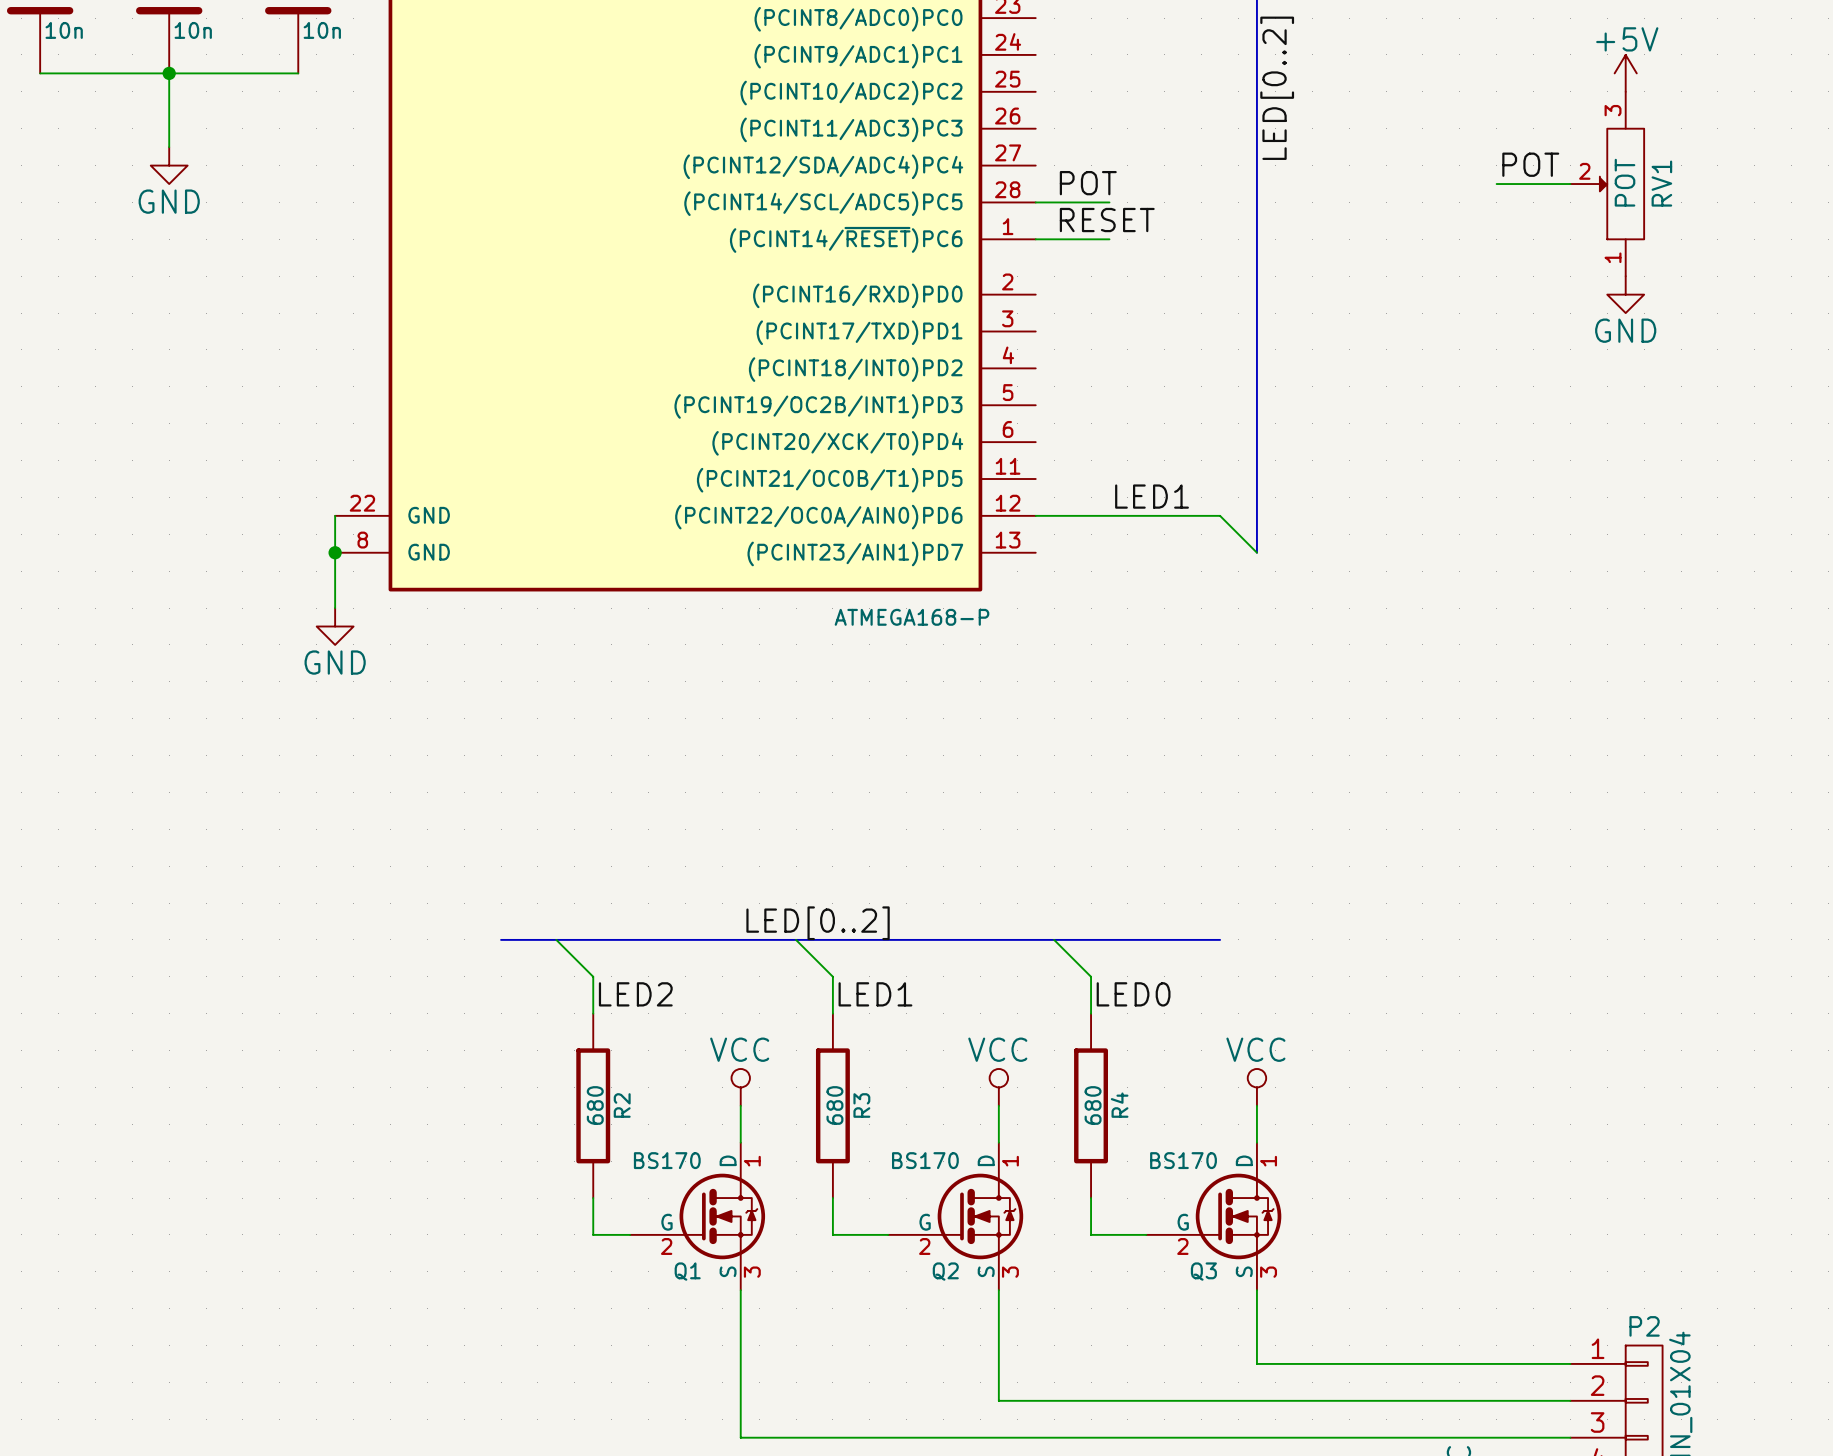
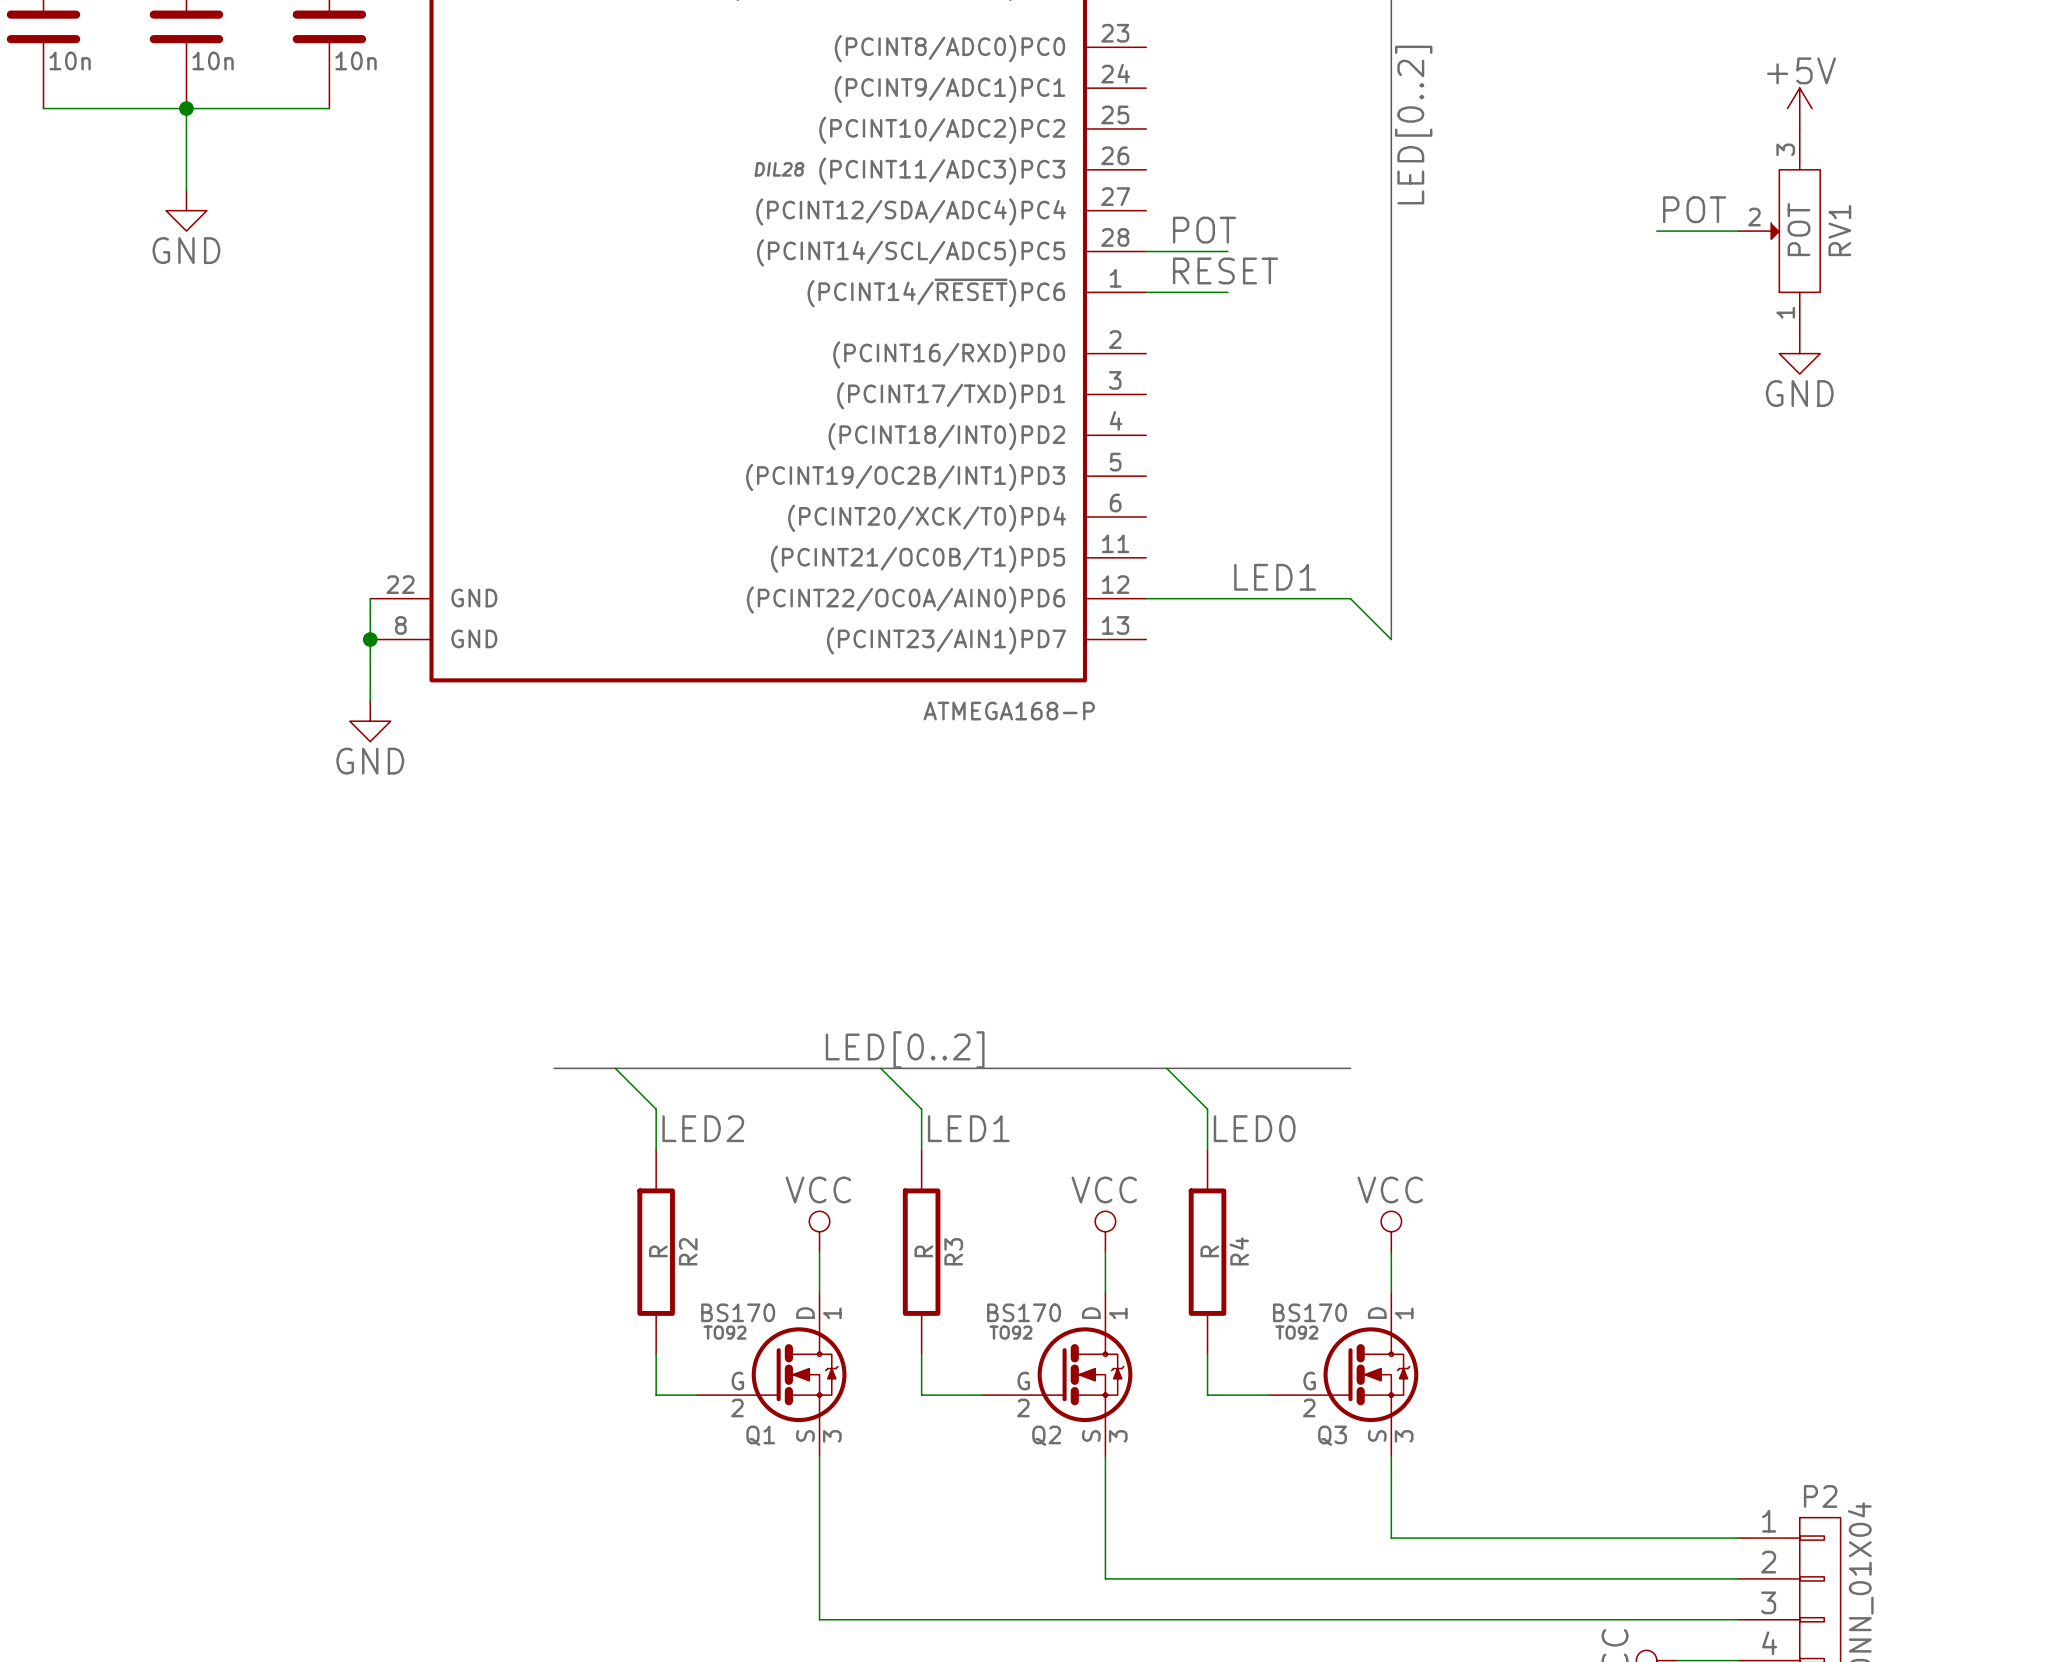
part text: none -> DIL28 (779, 169)
R2 value: 680 (595, 1105) -> R (658, 1251)
R3 value: 680 (834, 1105) -> R (923, 1251)
R4 value: 680 (1093, 1105) -> R (1209, 1251)
Q1 text: none -> TO92 (725, 1332)
Q2 text: none -> TO92 (1010, 1332)
Q3 text: none -> TO92 (1296, 1332)

